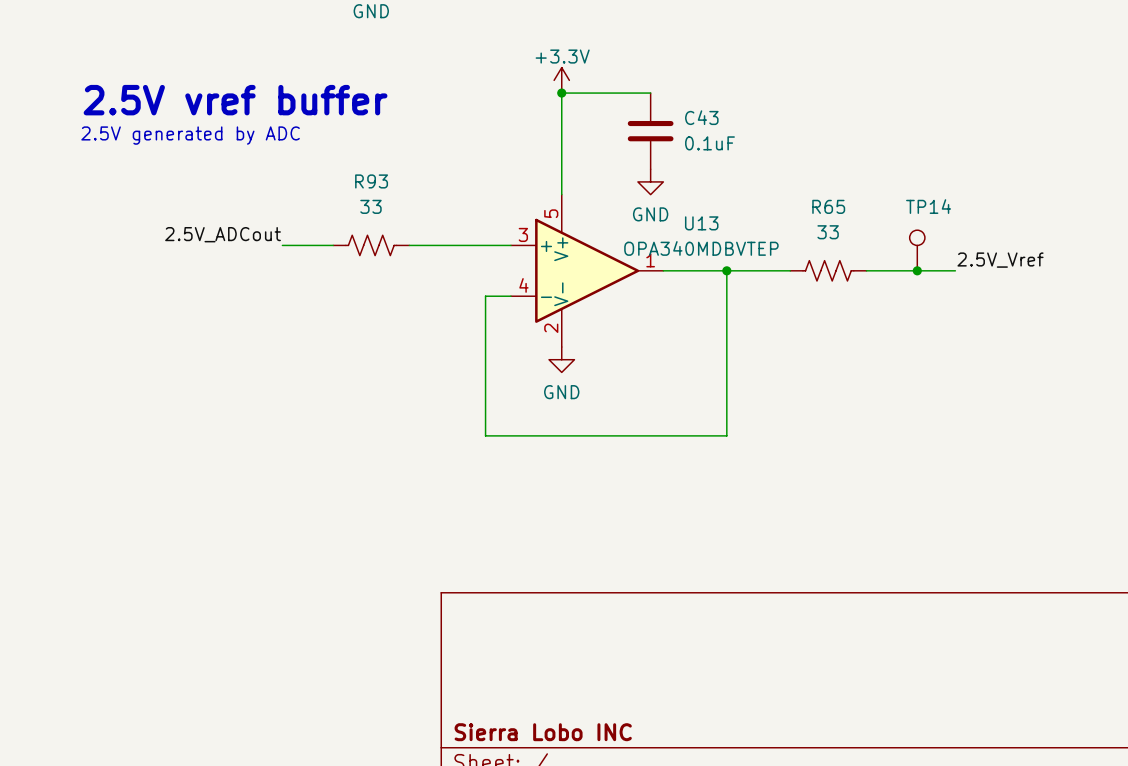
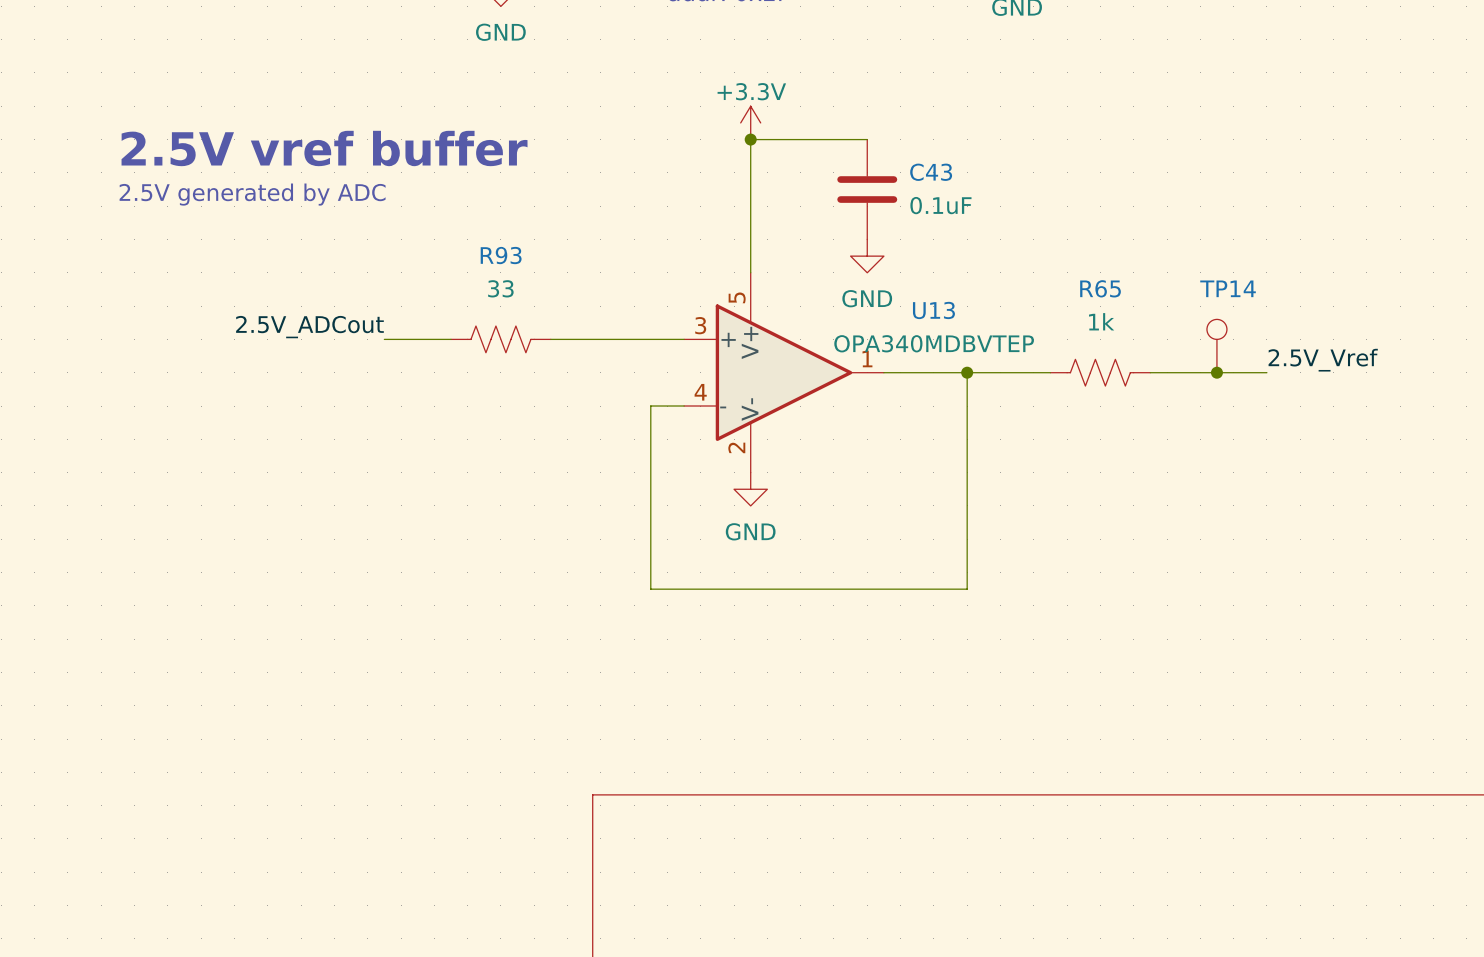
R65 value: 33 (828, 232) -> 1k (1101, 321)

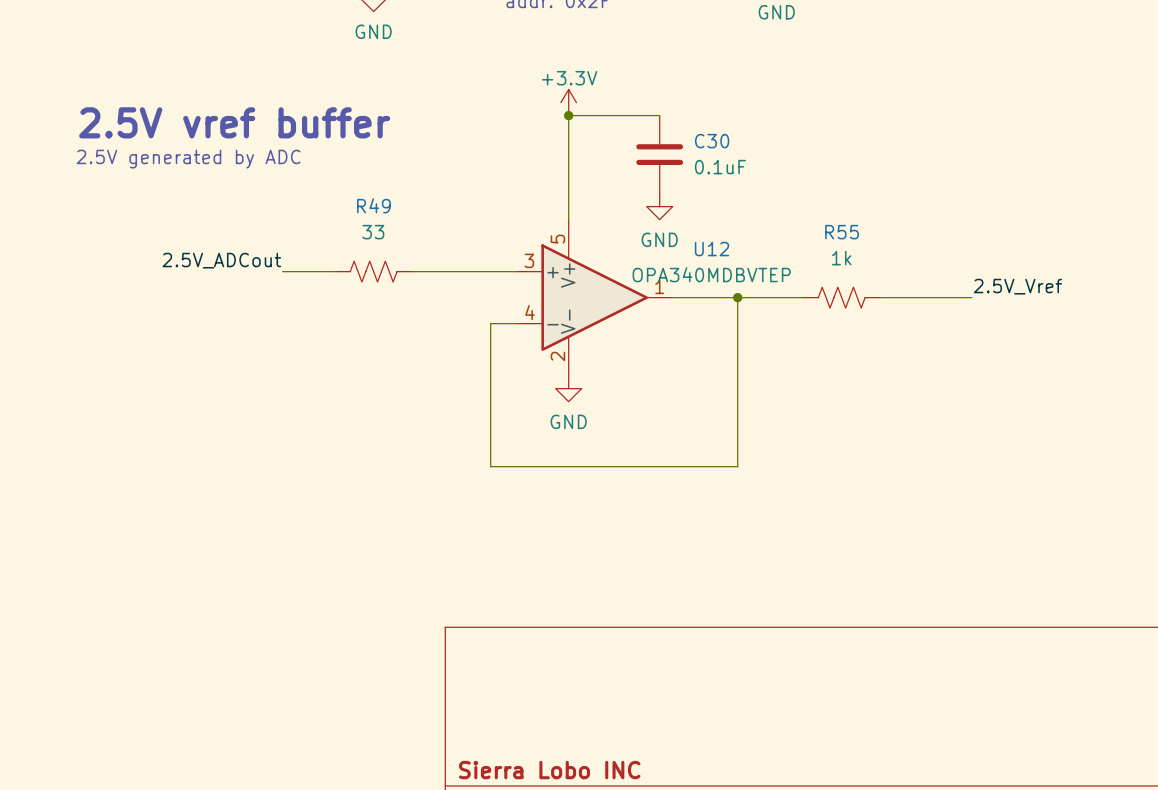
C43 name: C43 (931, 172) -> C30 (712, 141)
R93 name: R93 (501, 255) -> R49 (373, 205)
R65 name: R65 (1100, 288) -> R55 (842, 232)
U13 name: U13 (933, 310) -> U12 (712, 249)
TP14: (1216, 346) -> none
junction: (1216, 372) -> none

